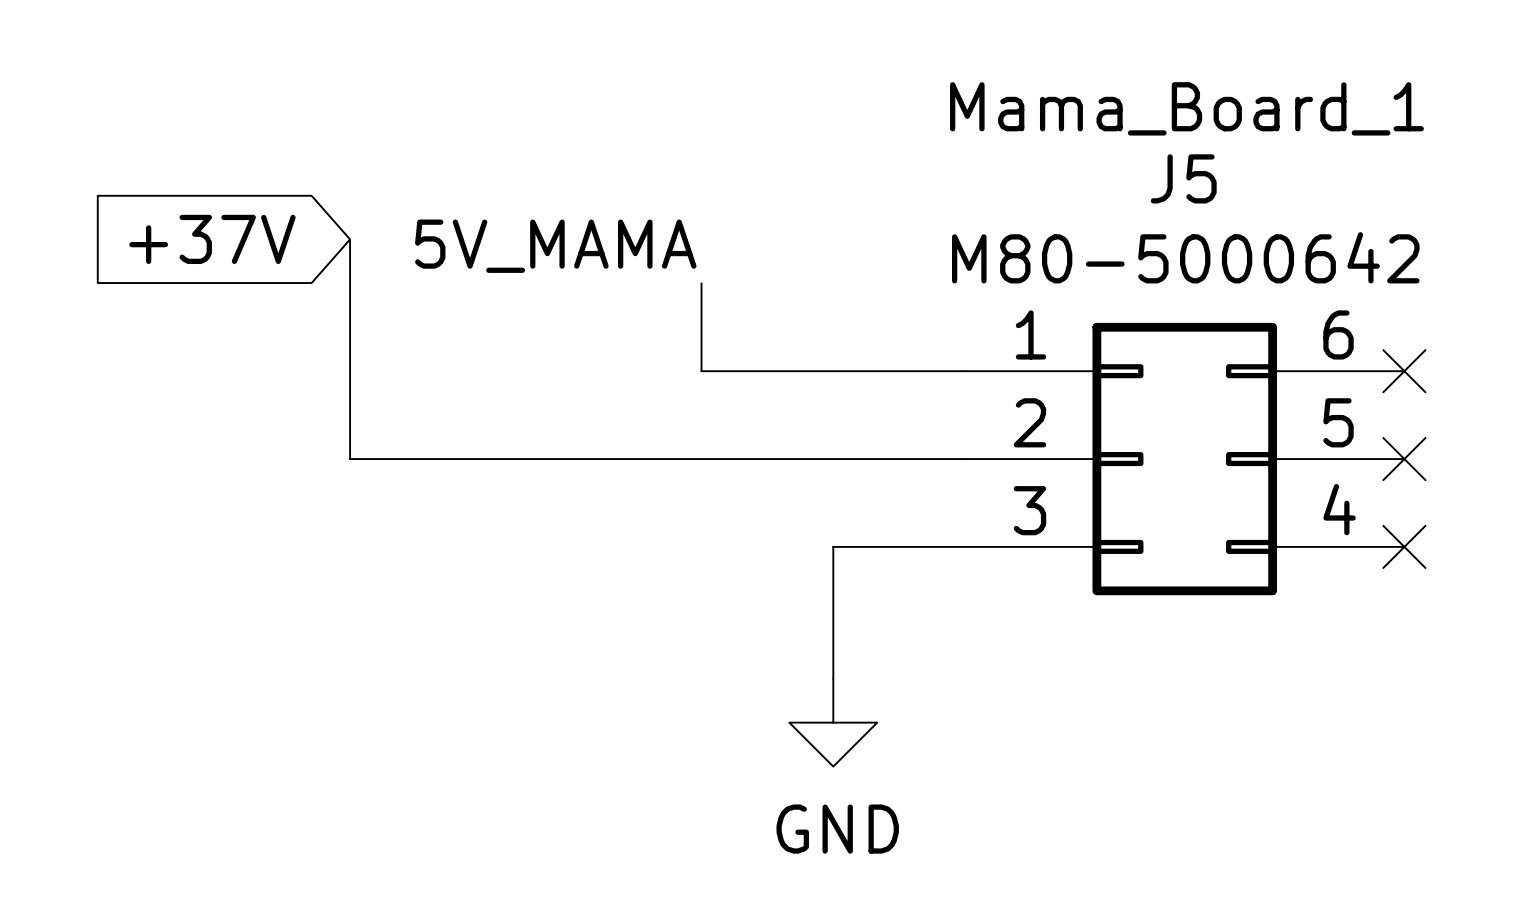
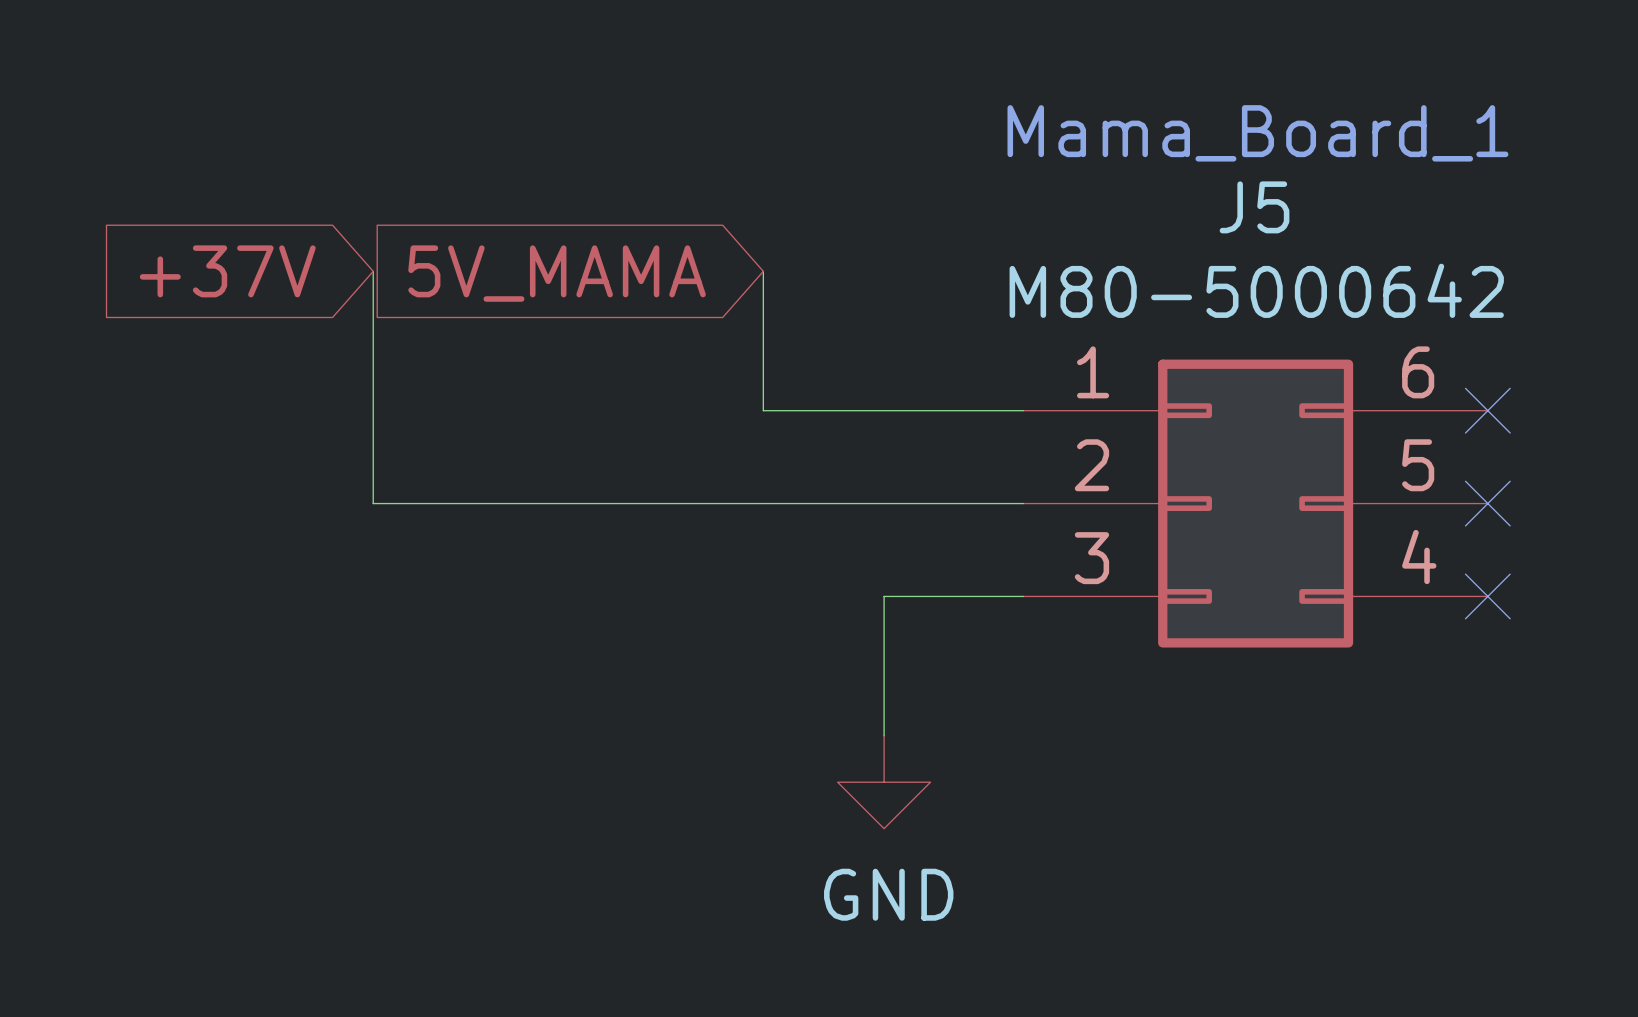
global label: none -> 5V_MAMA (557, 273)
label: 5V_MAMA (555, 246) -> none
wire: (701, 283) (701, 371) (719, 371) -> (763, 271) (763, 410)

